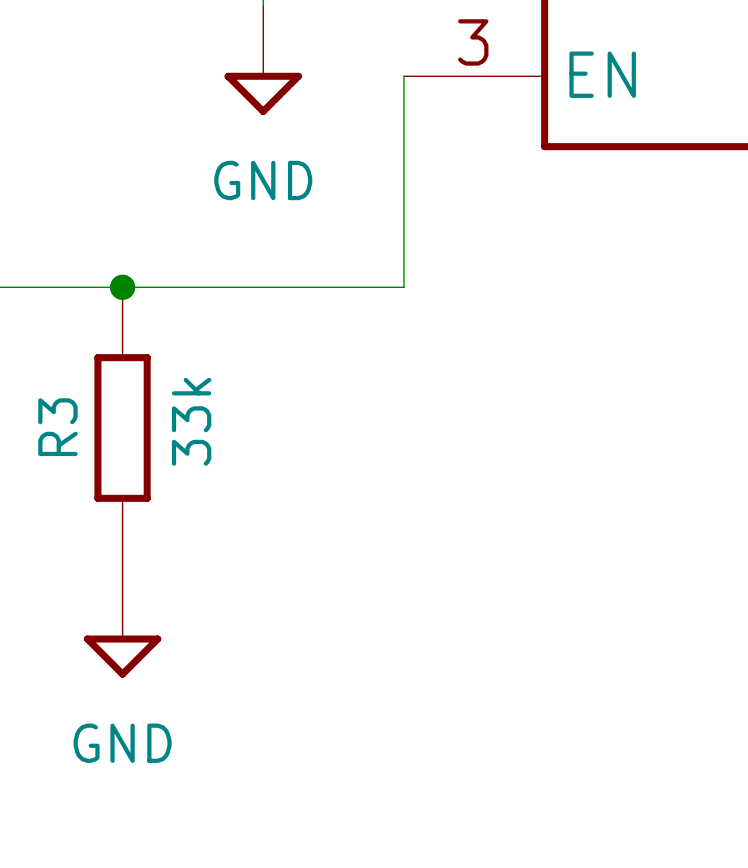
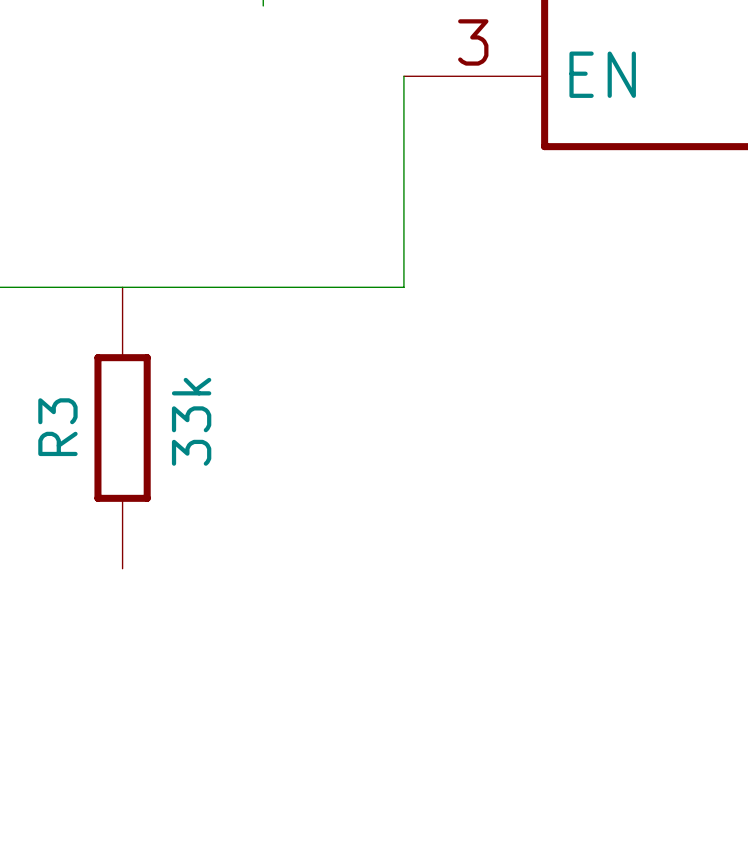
power symbol: GND (263, 60) -> none
junction: (122, 287) -> none
power symbol: GND (122, 623) -> none

